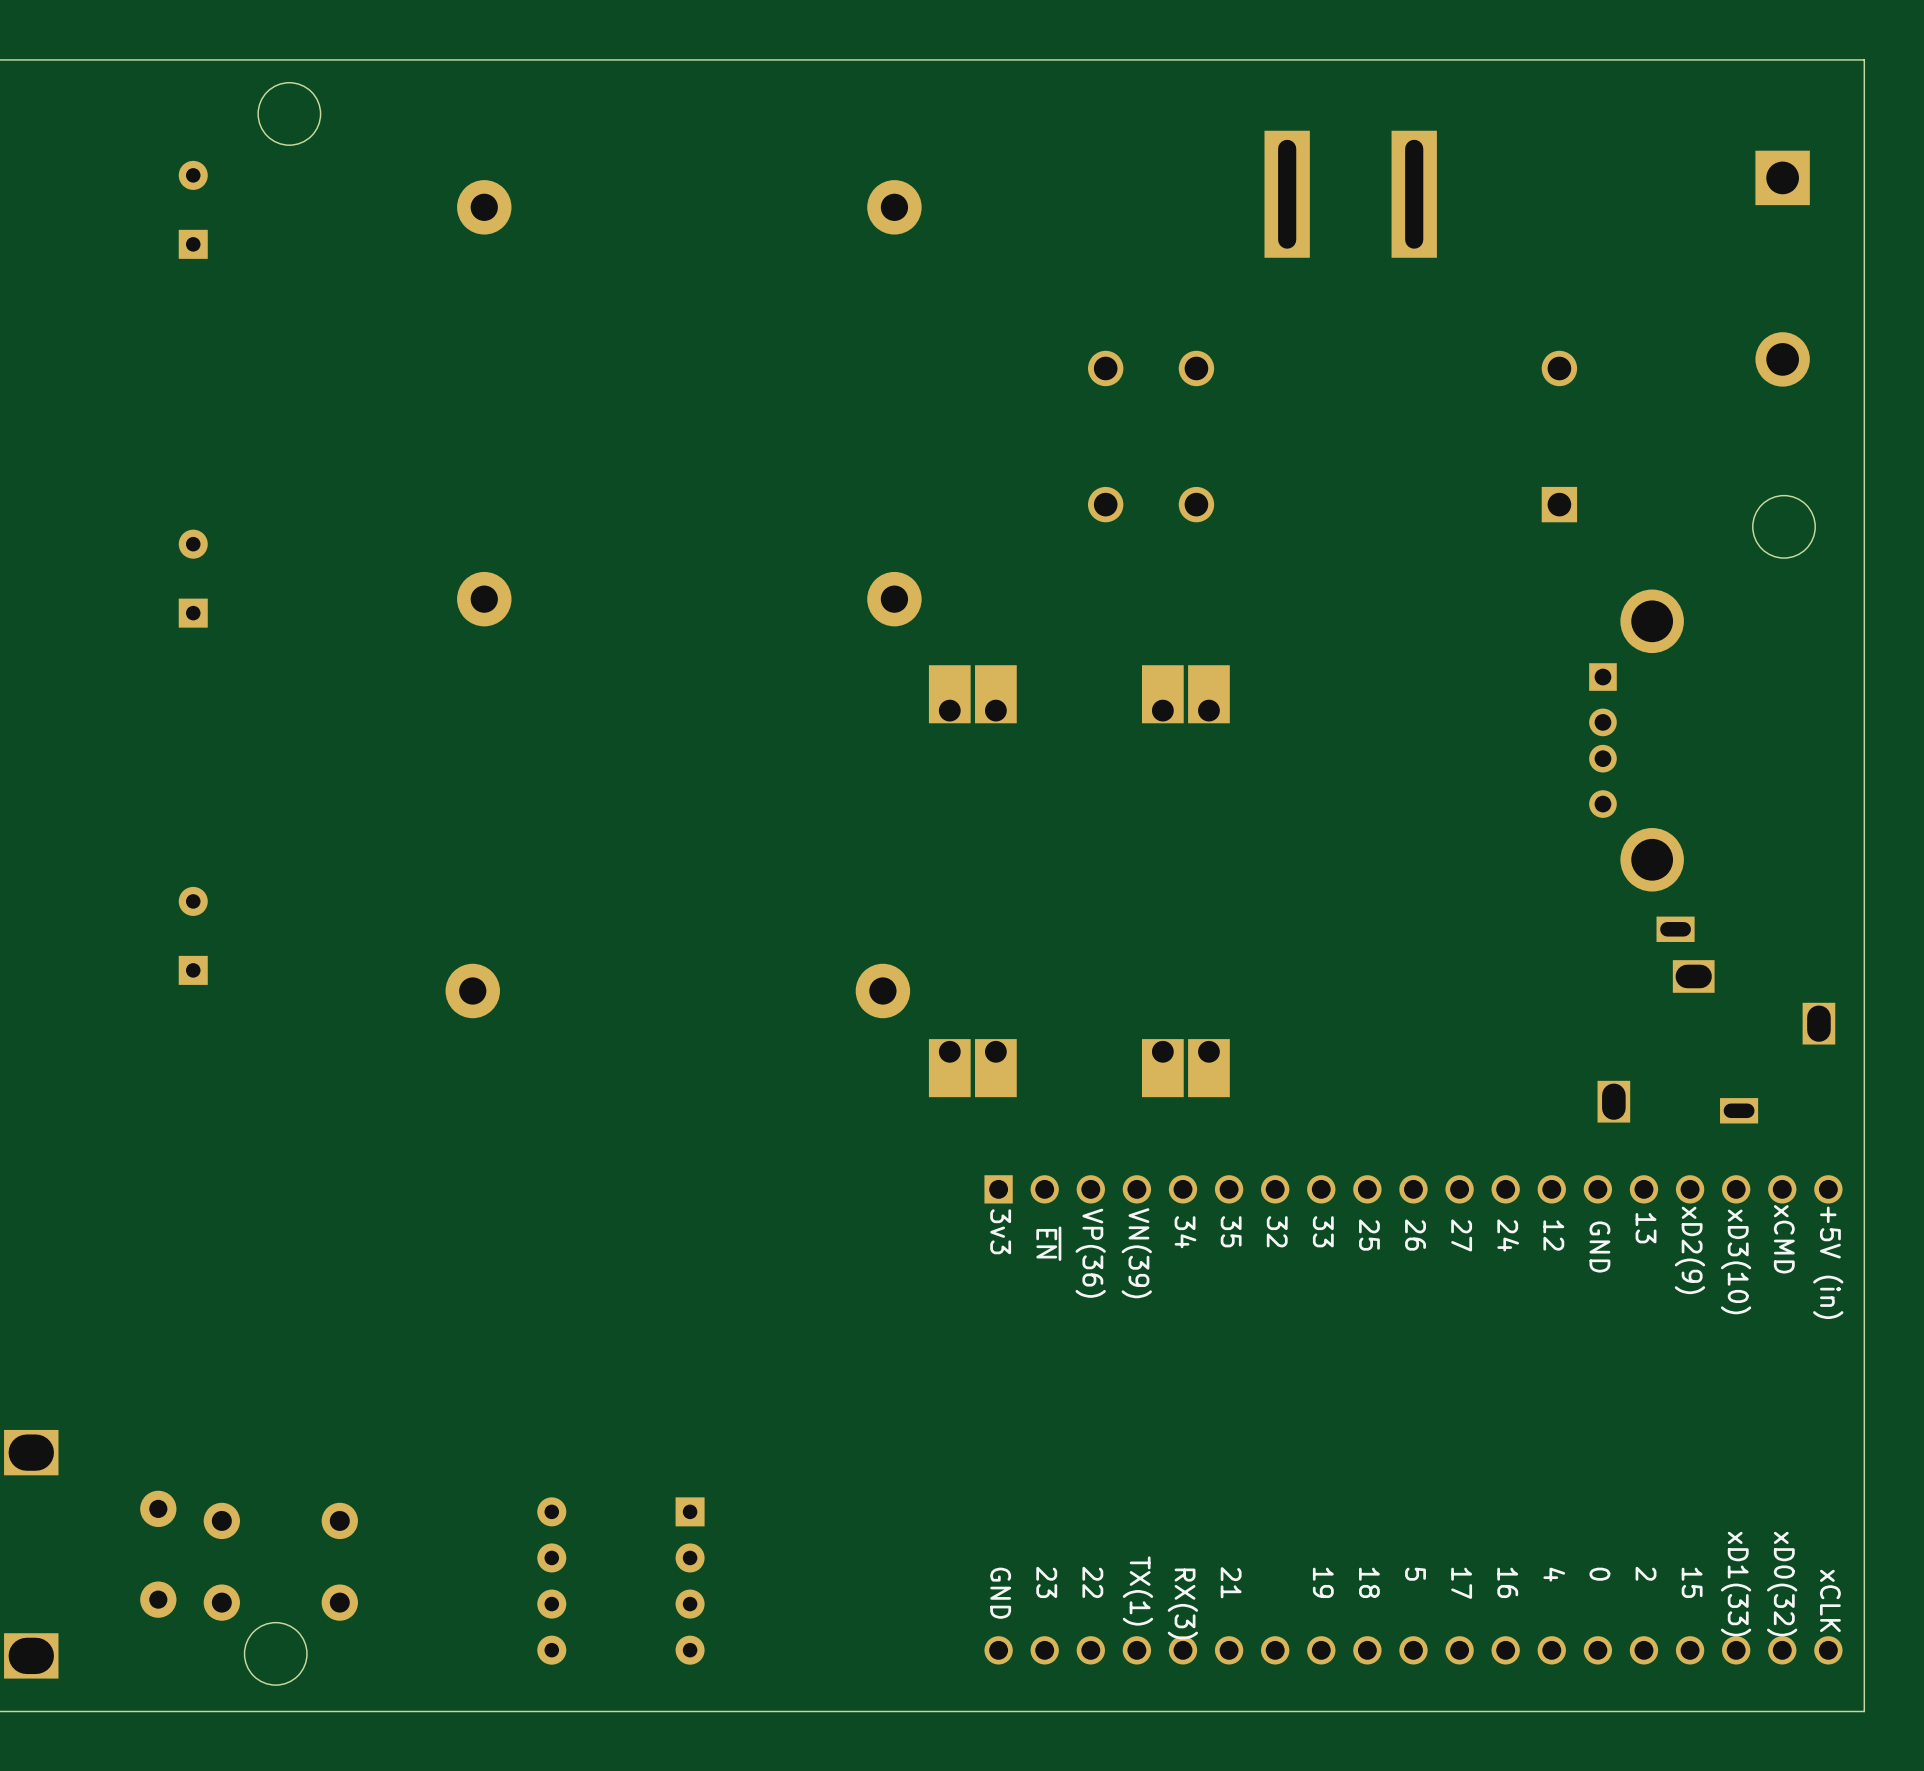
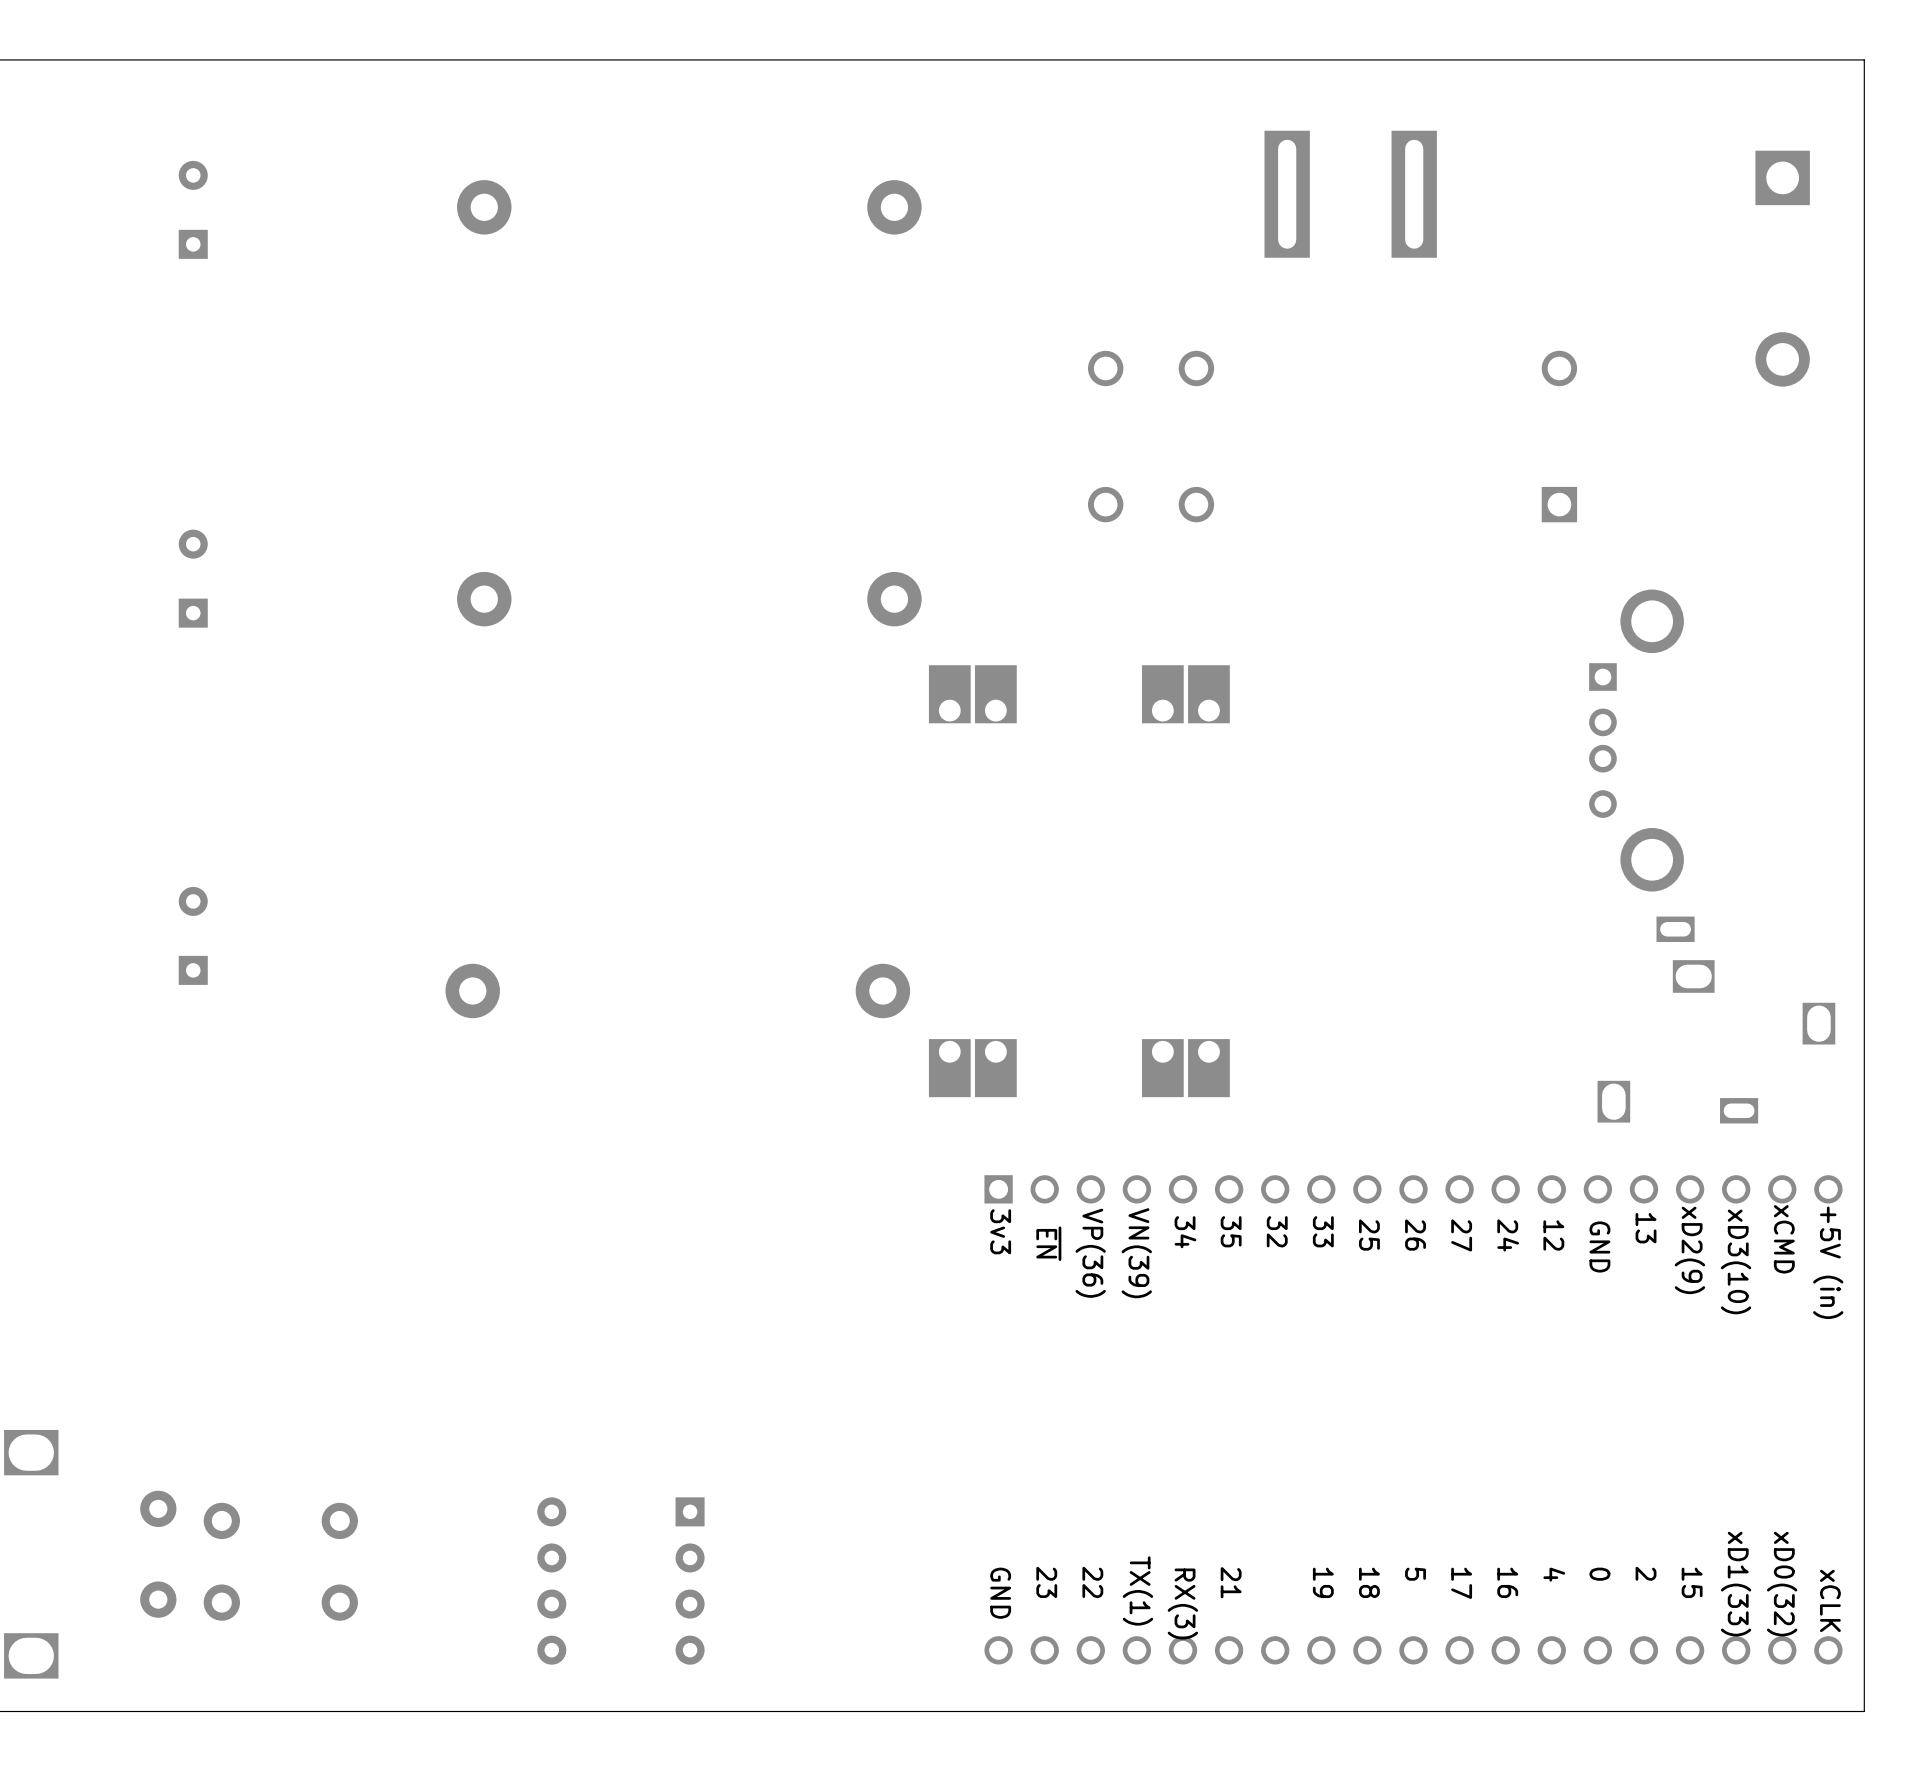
round board edge: [257, 82, 322, 146] -> none
round board edge: [1752, 495, 1816, 559] -> none
round board edge: [244, 1622, 308, 1686] -> none

